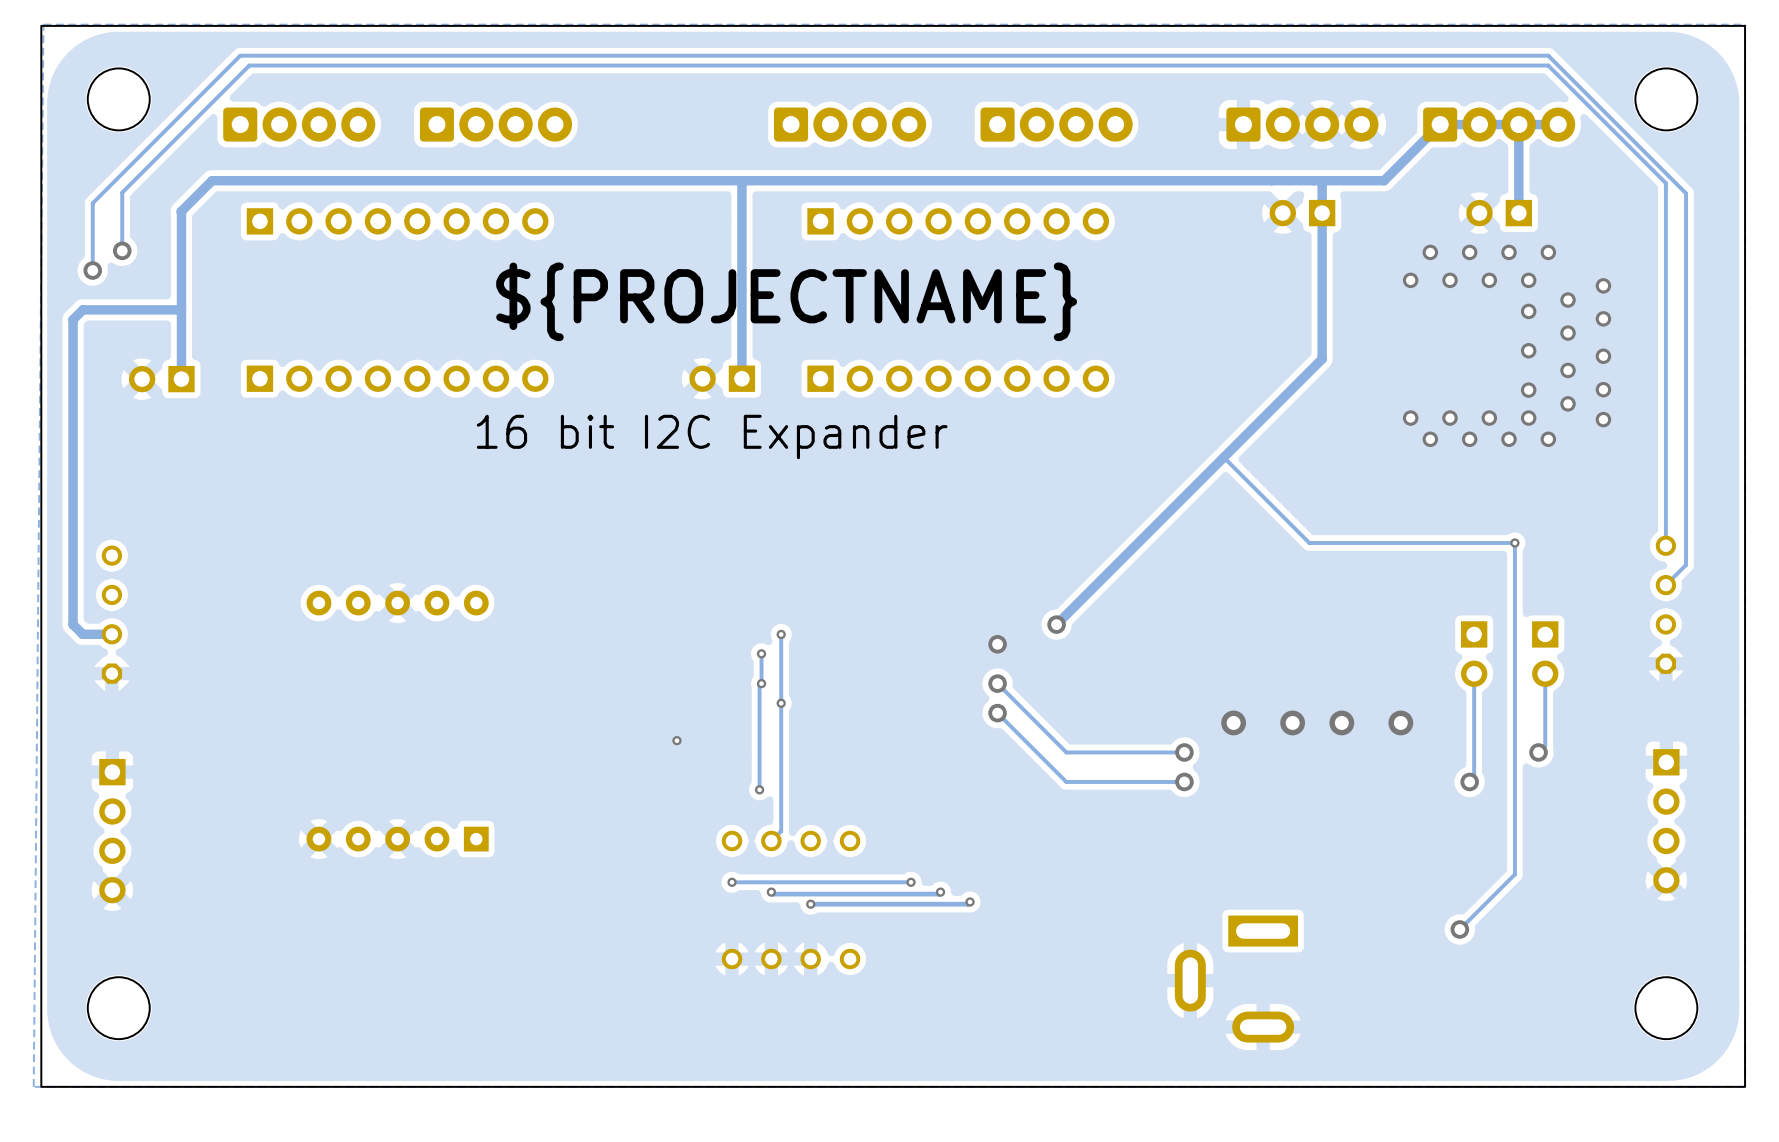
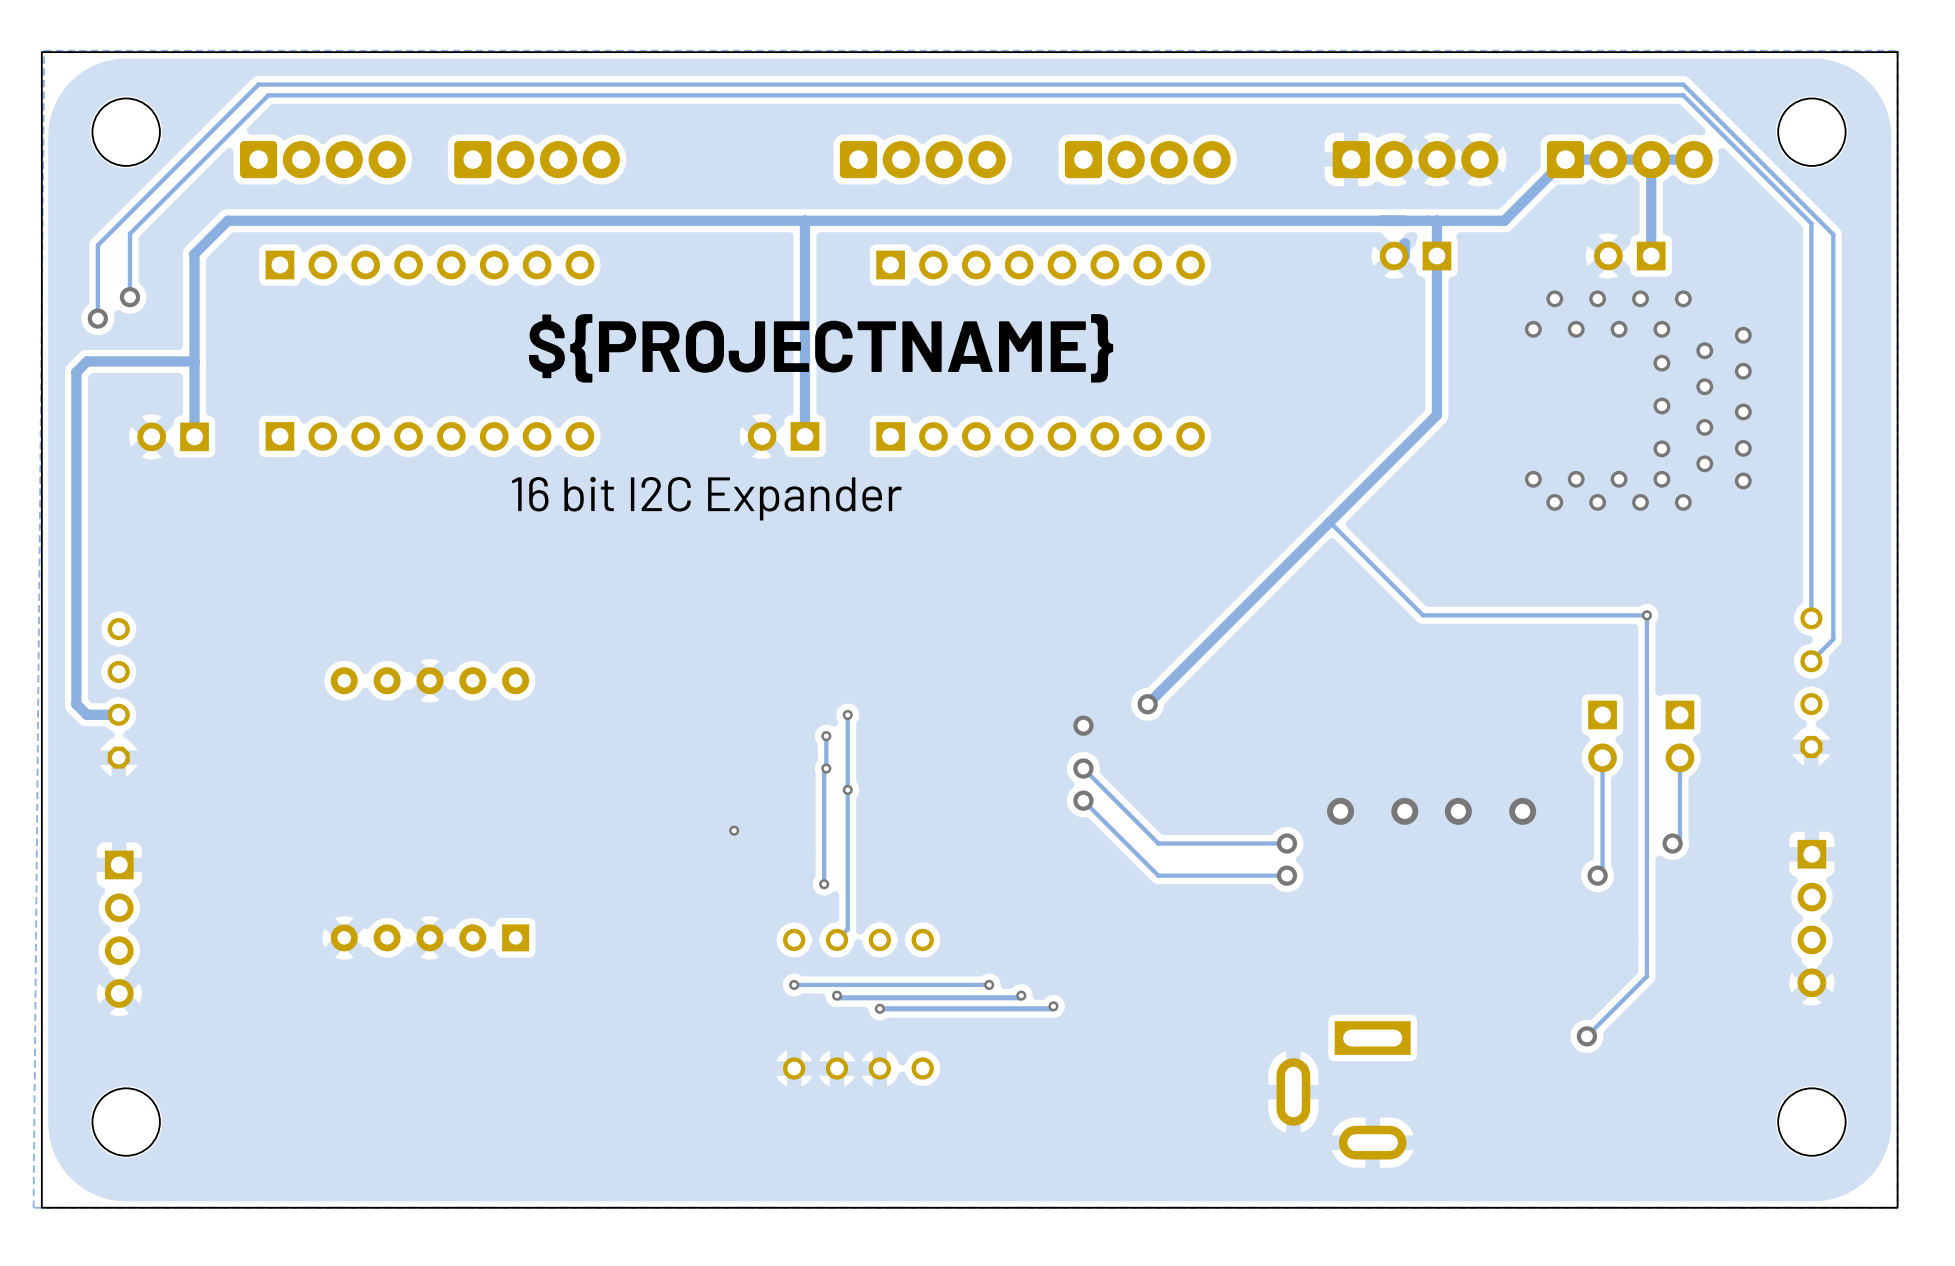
track: none -> (1404, 243) (1404, 255)

